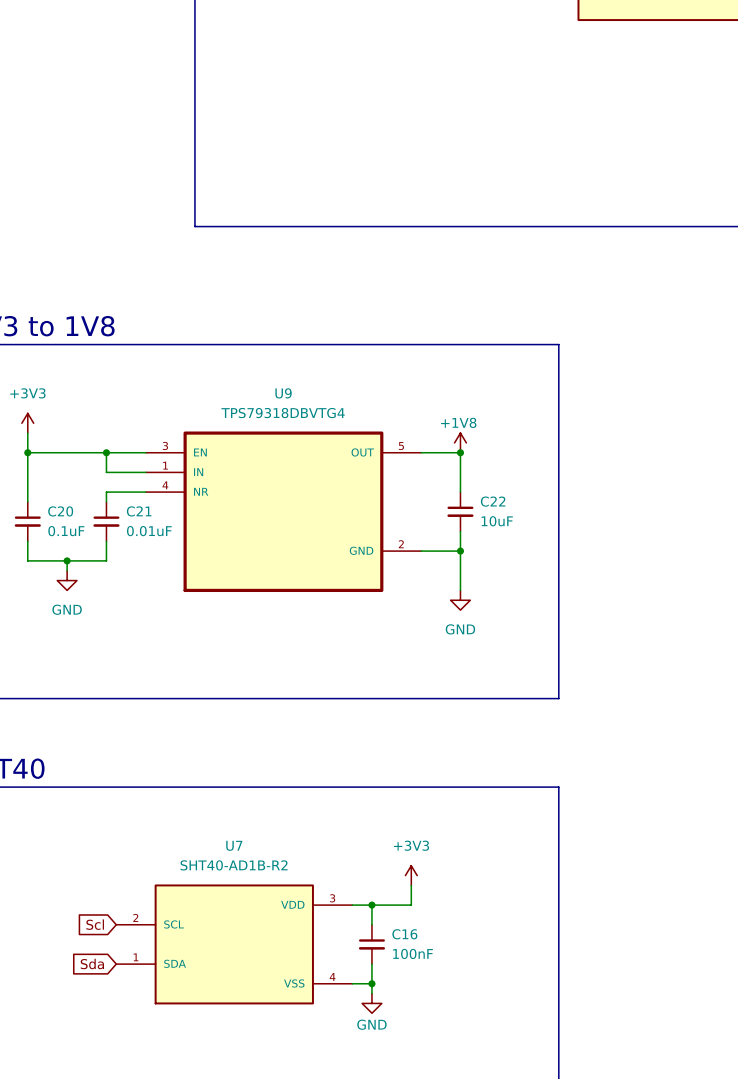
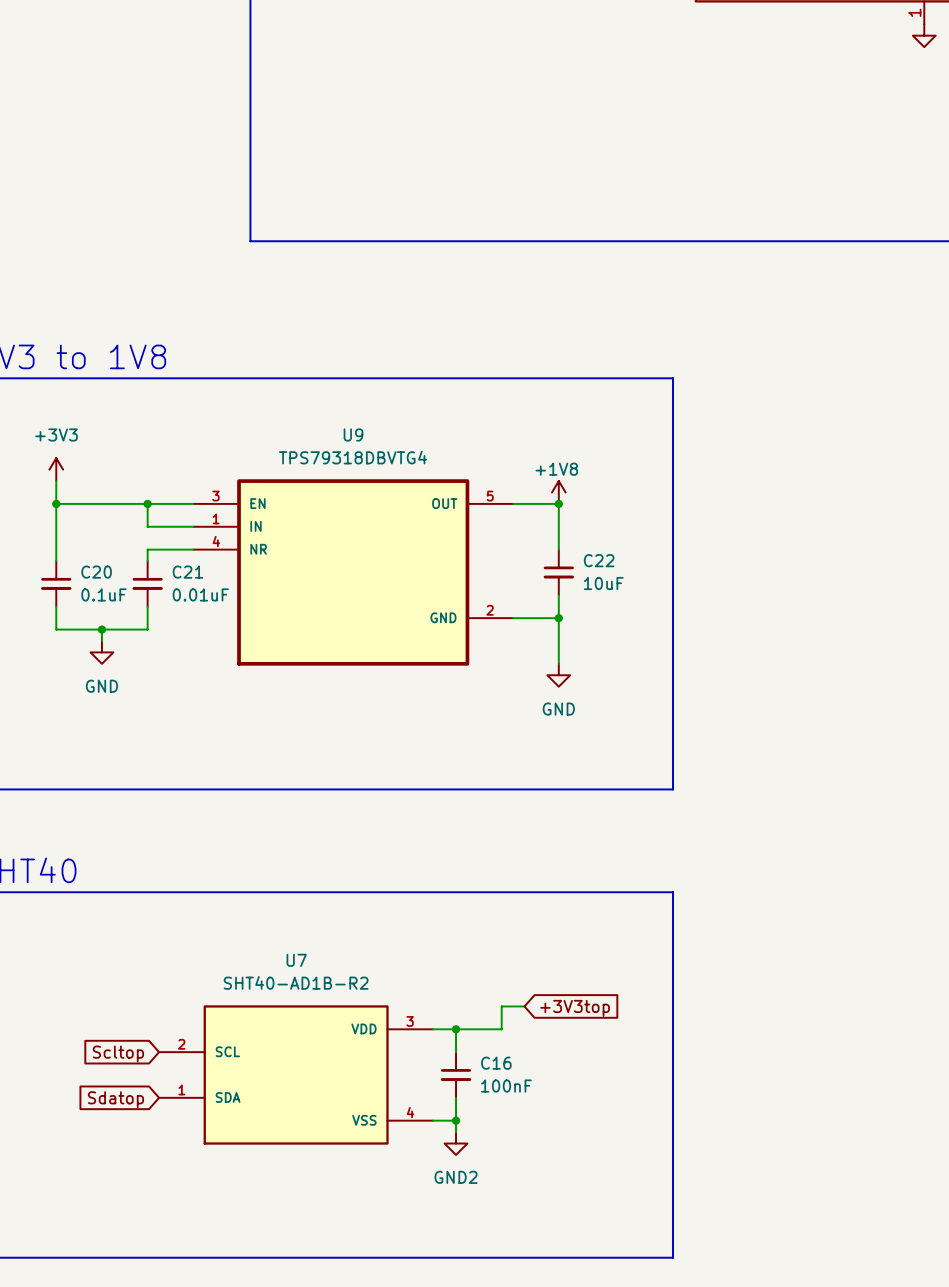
power symbol: +3V3 (411, 875) -> none
wire: none -> (501, 1006) (524, 1006)
global label: none -> +3V3top (575, 1008)
global label: Scl (95, 924) -> Scltop (118, 1054)
global label: Sda (92, 963) -> Sdatop (115, 1099)
power symbol: GND (371, 1003) -> GND2 (456, 1143)

